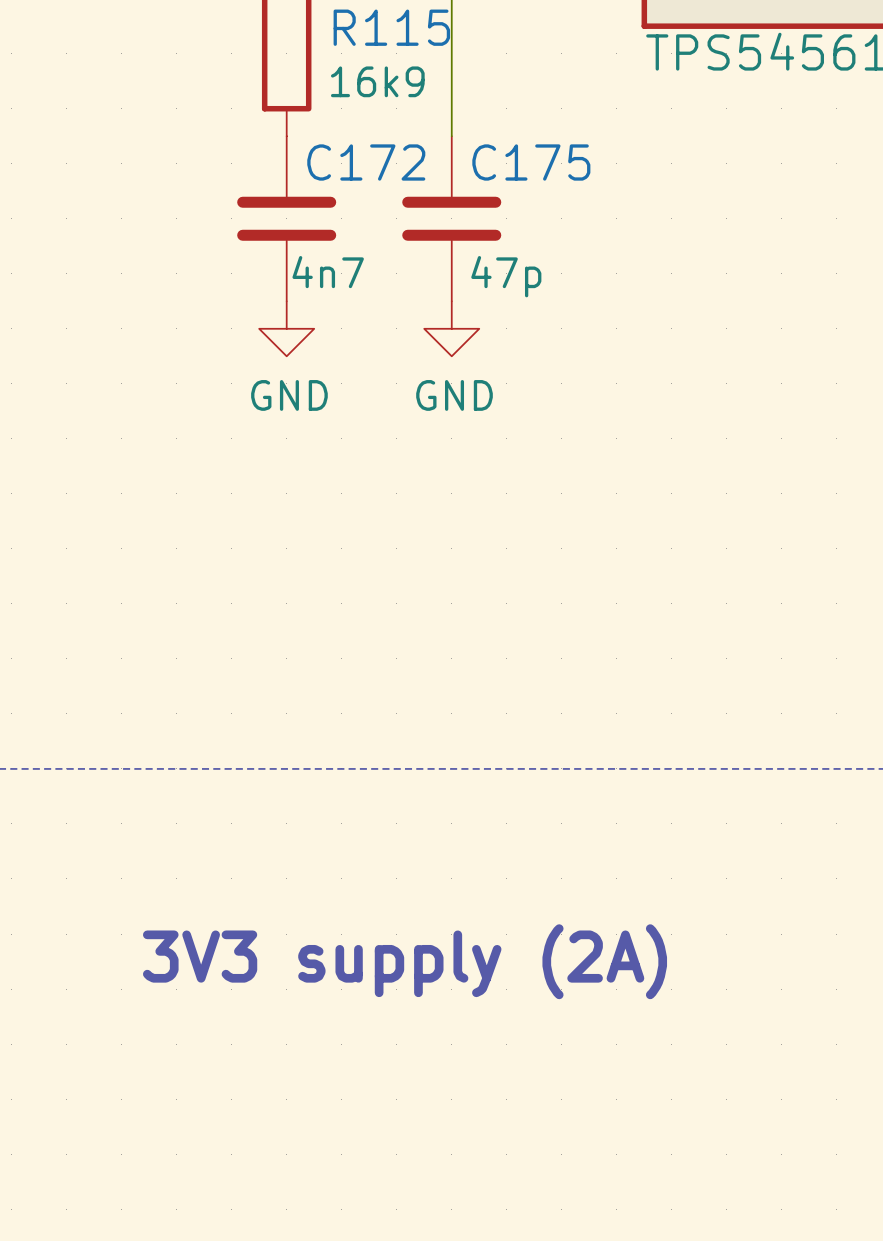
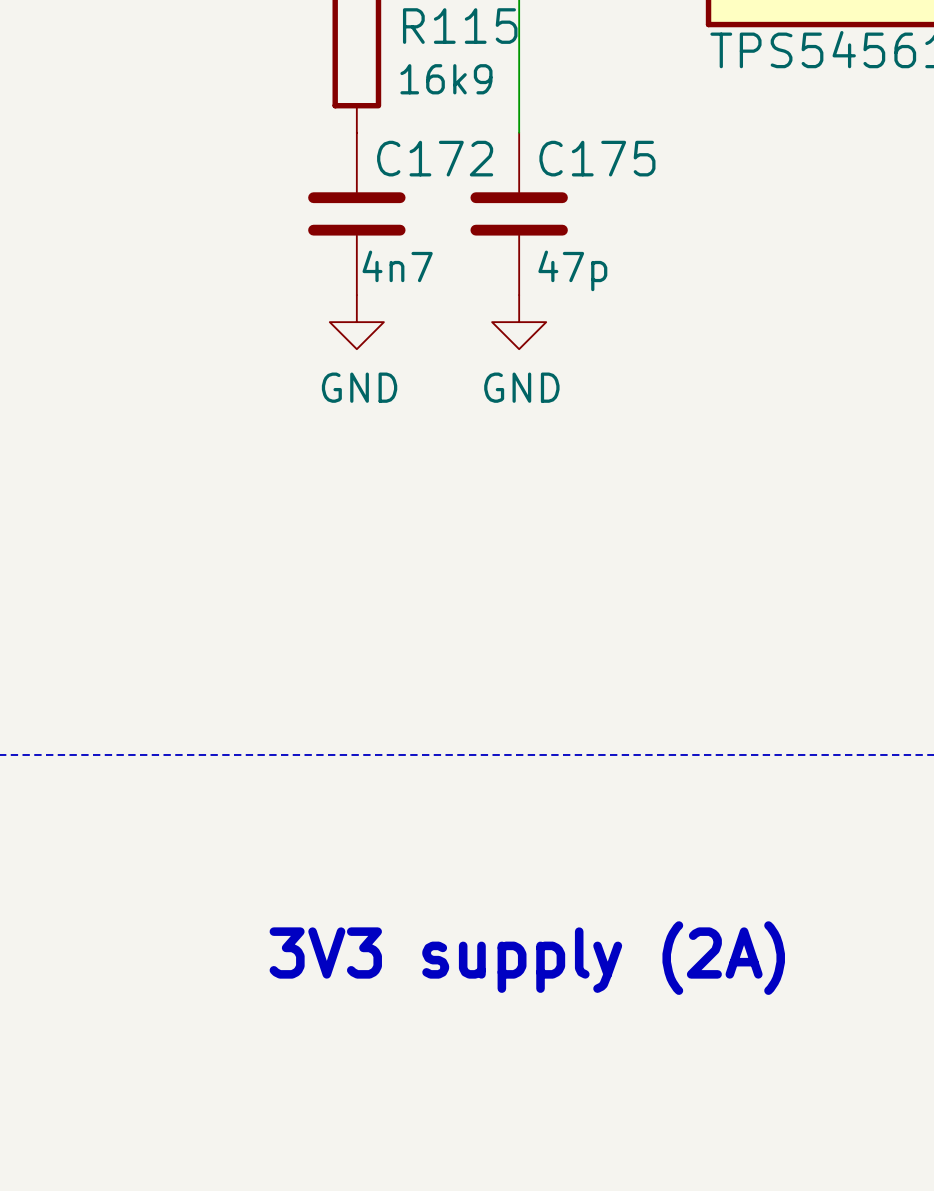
text position: 3V3 supply (2A) (405, 961) -> 3V3 supply (2A) (527, 958)

